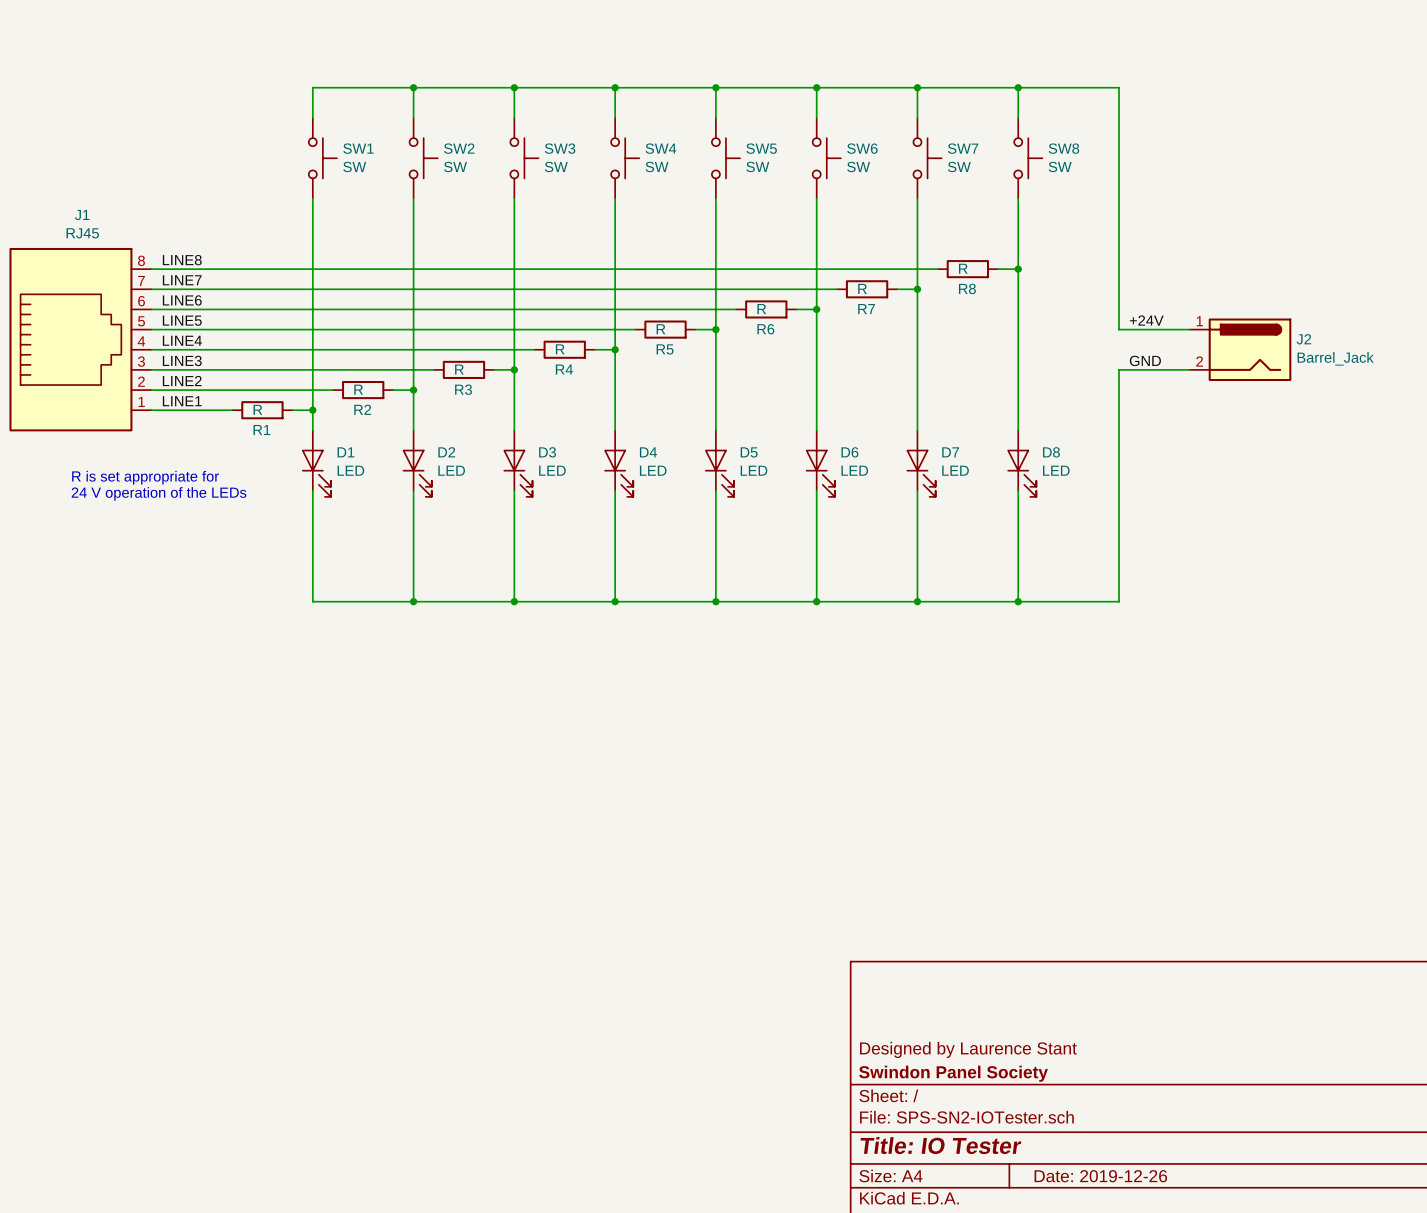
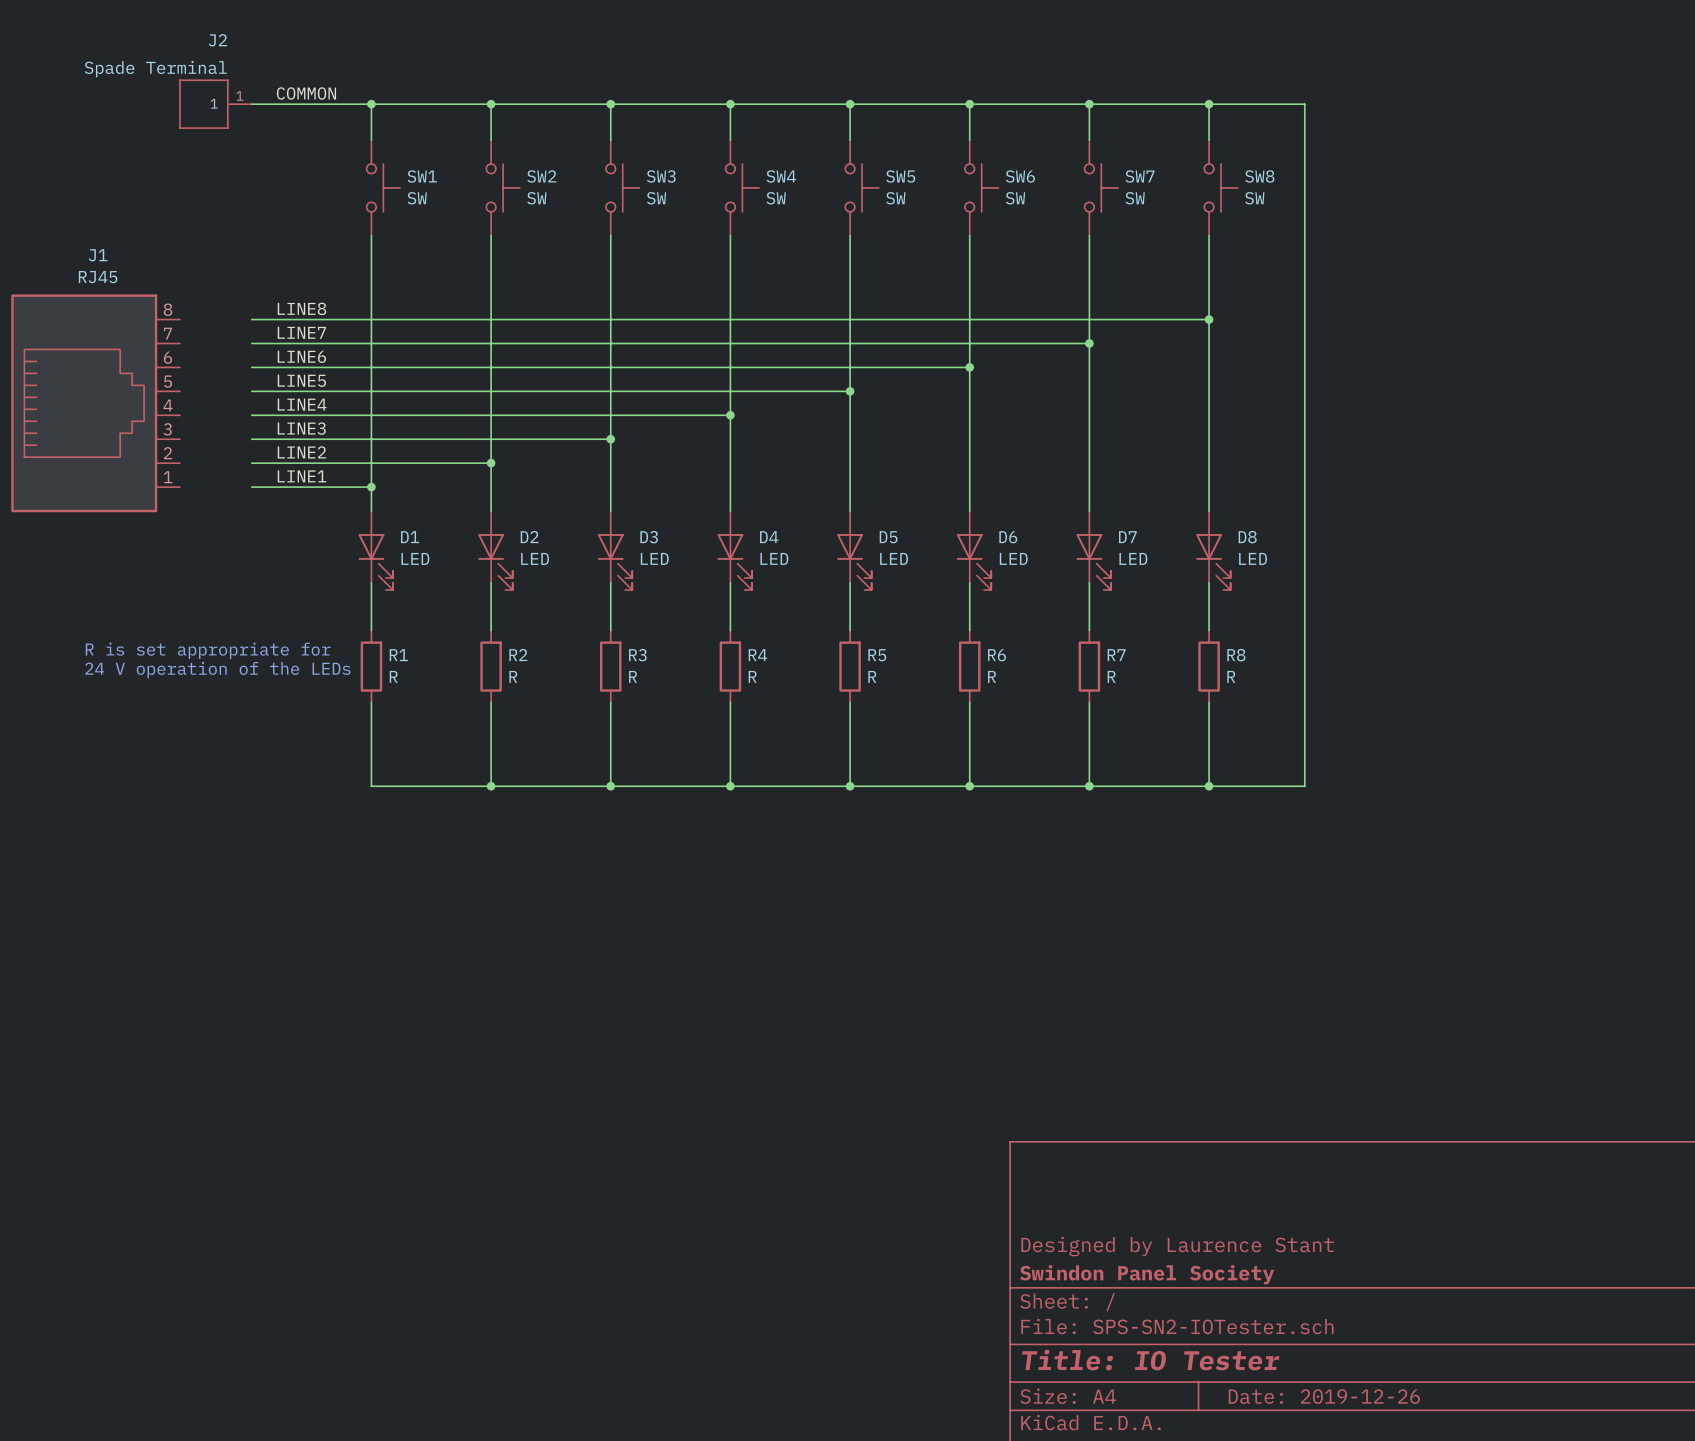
label: none -> COMMON (306, 93)
wire: none -> (251, 104) (371, 104)
junction: none -> (371, 104)
wire: (1098, 87) (1119, 87) (1119, 329) (1189, 329) -> none
label position: LINE8 (182, 260) -> LINE8 (301, 308)
R8 value position: R (963, 268) -> R (1231, 676)
wire: (151, 269) (212, 269) -> none
wire: none -> (1113, 319) (1185, 319)
R8 rotation: 0° (967, 269) -> 90° clockwise (1209, 666)
R8 position: (967, 269) -> (1209, 666)
label position: LINE7 (182, 280) -> LINE7 (301, 332)
R7 value position: R (862, 288) -> R (1111, 676)
R8 name position: R8 (967, 288) -> R8 (1236, 655)
wire: (151, 289) (212, 289) -> none
wire: none -> (993, 343) (1065, 343)
R7 rotation: 0° (867, 289) -> 90° clockwise (1089, 666)
R7 position: (867, 289) -> (1089, 666)
label position: LINE6 (182, 300) -> LINE6 (301, 356)
wire: (151, 309) (212, 309) -> none
wire: none -> (874, 367) (945, 367)
R6 value position: R (761, 309) -> R (991, 676)
R6 rotation: 0° (766, 309) -> 90° clockwise (969, 666)
R6 position: (766, 309) -> (969, 666)
R7 name position: R7 (866, 309) -> R7 (1116, 655)
J2 symbol: [1189, 318, 1292, 381] -> [179, 79, 252, 129]
label position: LINE5 (182, 320) -> LINE5 (301, 380)
label: +24V (1146, 320) -> none
wire: (151, 329) (212, 329) -> none
wire: none -> (754, 391) (826, 391)
R5 value position: R (660, 329) -> R (872, 676)
R5 rotation: 0° (665, 329) -> 90° clockwise (850, 666)
R5 position: (665, 329) -> (850, 666)
R6 name position: R6 (765, 329) -> R6 (997, 655)
J2 name position: J2 (1303, 339) -> J2 (217, 40)
label position: LINE4 (182, 340) -> LINE4 (302, 404)
wire: (151, 349) (212, 349) -> none
wire: none -> (634, 415) (706, 415)
R4 value position: R (560, 349) -> R (752, 676)
R4 rotation: 0° (564, 349) -> 90° clockwise (730, 666)
R4 position: (564, 349) -> (730, 666)
R5 name position: R5 (665, 349) -> R5 (877, 655)
J2 value: Barrel_Jack (1335, 358) -> Spade Terminal (155, 69)
label position: LINE3 (182, 360) -> LINE3 (301, 428)
label: GND (1145, 360) -> none
wire: (151, 369) (212, 369) -> none
wire: none -> (515, 439) (586, 439)
R3 value position: R (459, 369) -> R (632, 676)
R3 rotation: 0° (463, 369) -> 90° clockwise (610, 666)
R3 position: (463, 369) -> (610, 666)
R4 name position: R4 (564, 369) -> R4 (757, 655)
wire: (1189, 369) (1119, 369) (1119, 601) (312, 601) -> (1304, 104) (1304, 786) (371, 786) (371, 714)
label position: LINE2 (182, 380) -> LINE2 (301, 452)
R2 value position: R (358, 389) -> R (513, 676)
R3 name position: R3 (463, 389) -> R3 (637, 655)
wire: (151, 390) (212, 390) -> (395, 463) (467, 463)
R2 rotation: 0° (363, 390) -> 90° clockwise (491, 666)
R2 position: (363, 390) -> (491, 666)
label position: LINE1 (182, 401) -> LINE1 (302, 476)
R1 value position: R (257, 409) -> R (393, 676)
R2 name position: R2 (362, 409) -> R2 (518, 655)
wire: (151, 410) (212, 410) -> (275, 487) (347, 487)
R1 rotation: 0° (262, 410) -> 90° clockwise (371, 666)
R1 position: (262, 410) -> (371, 666)
R1 name position: R1 (261, 429) -> R1 (398, 655)
text position: R is set appropriate for (145, 477) -> R is set appropriate for (208, 650)
text position: 24 V operation of the LEDs (159, 493) -> 24 V operation of the LEDs (217, 670)
wire: (312, 531) (312, 591) -> none
wire: (413, 531) (413, 591) -> (491, 714) (491, 786)
wire: (514, 531) (514, 591) -> (610, 714) (610, 786)
wire: (615, 531) (615, 591) -> (730, 714) (730, 786)
wire: (715, 531) (715, 591) -> (850, 714) (850, 786)
wire: (816, 531) (816, 591) -> (969, 714) (969, 786)
wire: (917, 531) (917, 591) -> (1089, 714) (1089, 786)
wire: (1018, 531) (1018, 591) -> (1209, 714) (1209, 786)
junction: (413, 601) -> none
junction: (514, 601) -> none
junction: (615, 601) -> none
junction: (715, 601) -> none
junction: (816, 601) -> none
junction: (917, 601) -> none
junction: (1018, 601) -> none
junction: none -> (491, 786)
junction: none -> (610, 786)
junction: none -> (730, 786)
junction: none -> (850, 786)
junction: none -> (969, 786)
junction: none -> (1089, 786)
junction: none -> (1209, 786)

